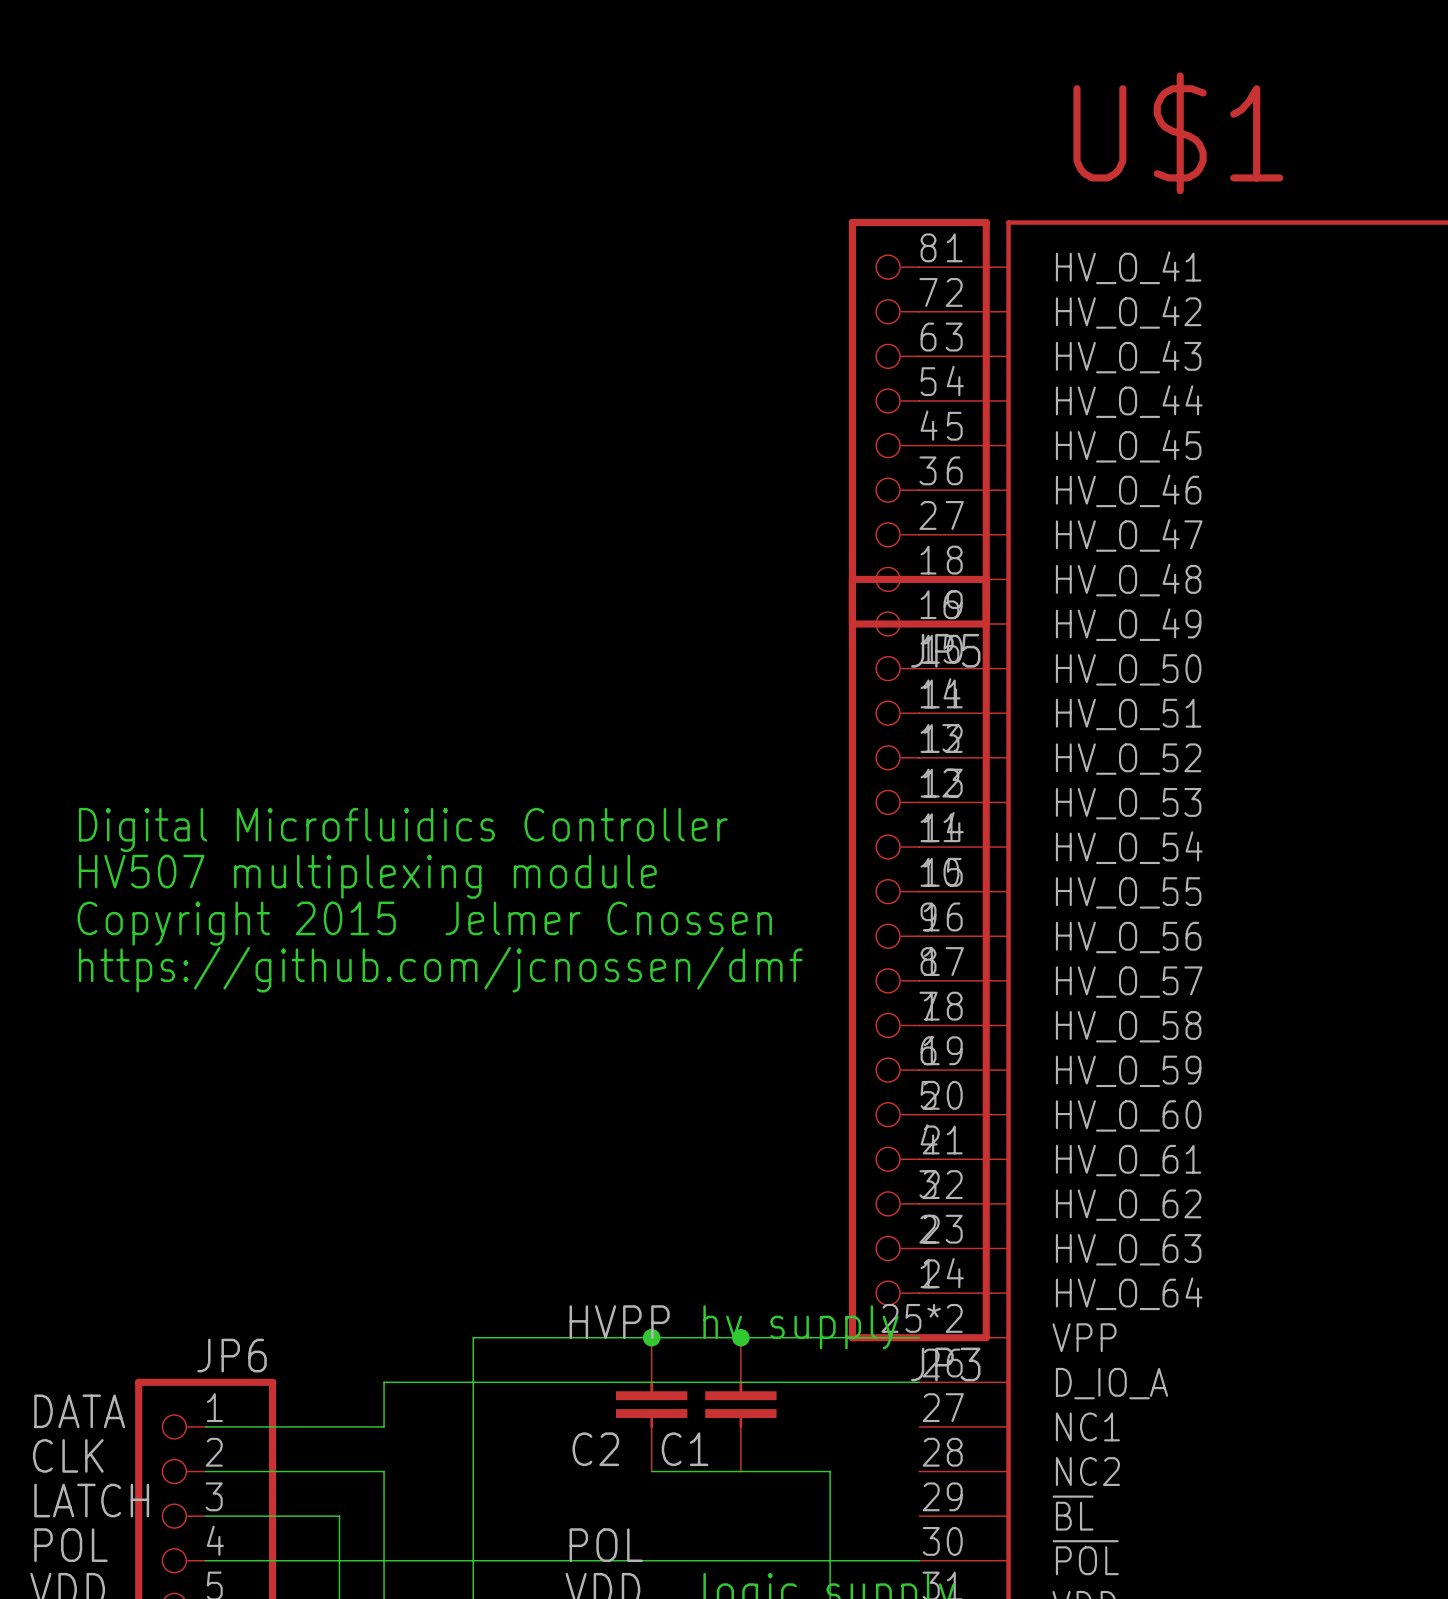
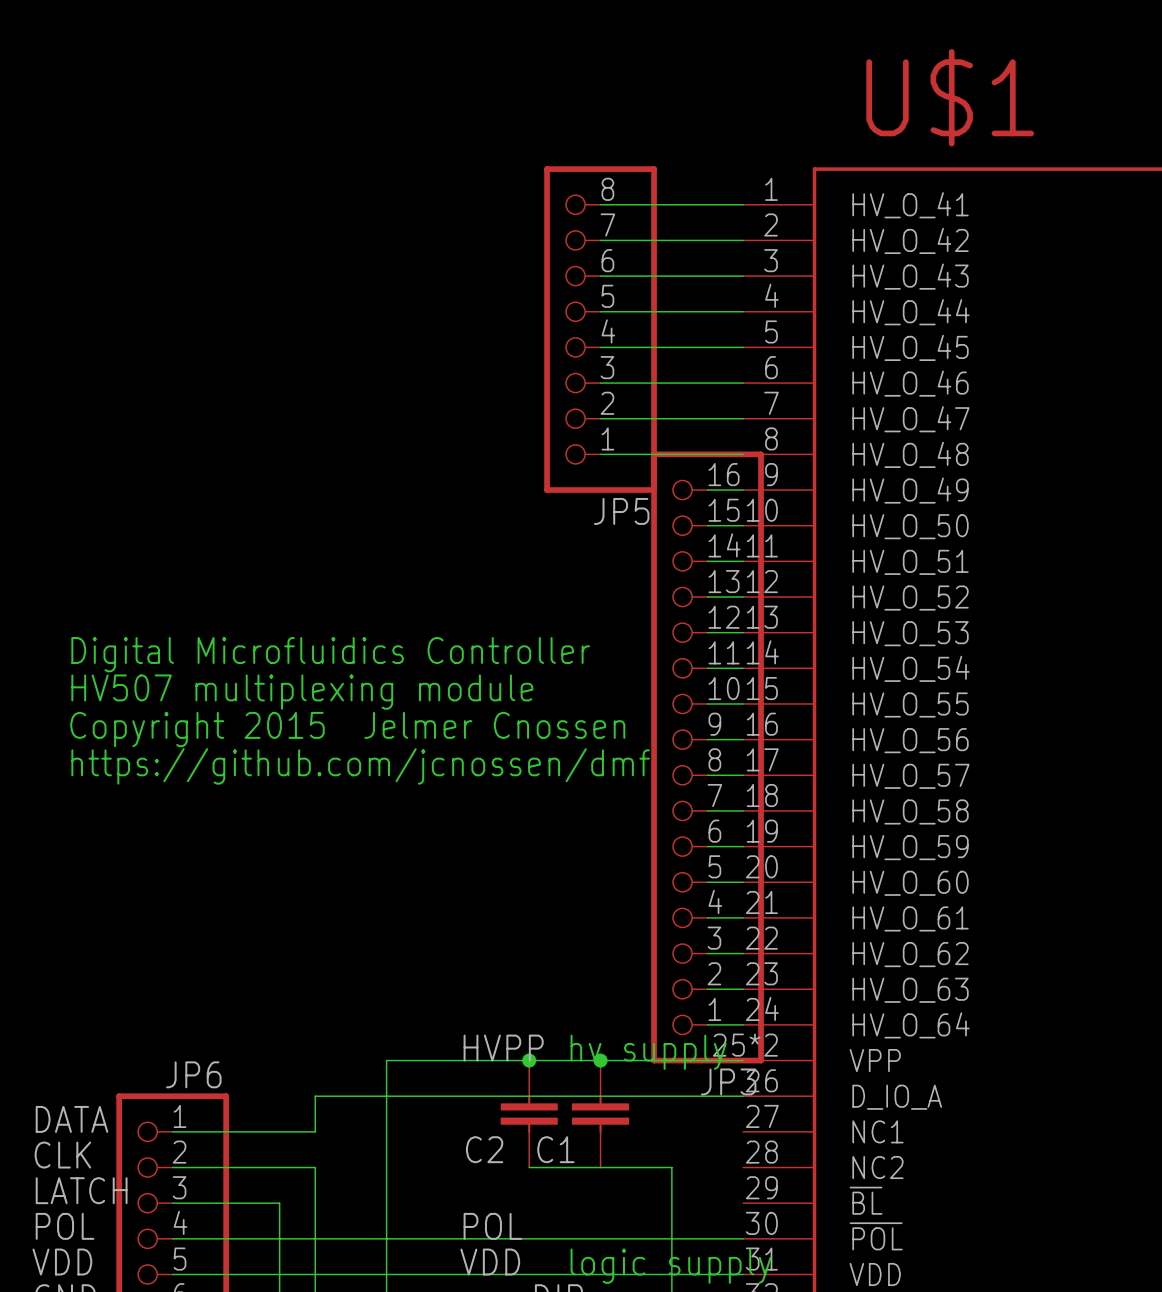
wire: none -> (600, 204) (743, 204)
wire: none -> (600, 240) (743, 240)
wire: none -> (600, 276) (743, 276)
wire: none -> (600, 311) (743, 311)
JP5 position: (919, 423) -> (600, 329)
wire: none -> (600, 347) (743, 347)
wire: none -> (600, 383) (743, 383)
wire: none -> (600, 418) (743, 418)
wire: none -> (600, 454) (743, 454)
wire: none -> (707, 525) (743, 525)
wire: none -> (707, 561) (743, 561)
wire: none -> (707, 597) (743, 597)
wire: none -> (707, 632) (743, 632)
wire: none -> (707, 668) (743, 668)
wire: none -> (707, 703) (743, 703)
wire: none -> (707, 739) (743, 739)
JP3 position: (919, 958) -> (707, 757)
wire: none -> (707, 775) (743, 775)
wire: none -> (707, 810) (743, 810)
wire: none -> (707, 846) (743, 846)
wire: none -> (707, 882) (743, 882)
wire: none -> (707, 917) (743, 917)
wire: none -> (707, 953) (743, 953)
wire: none -> (707, 989) (743, 989)
wire: none -> (707, 1024) (743, 1024)

